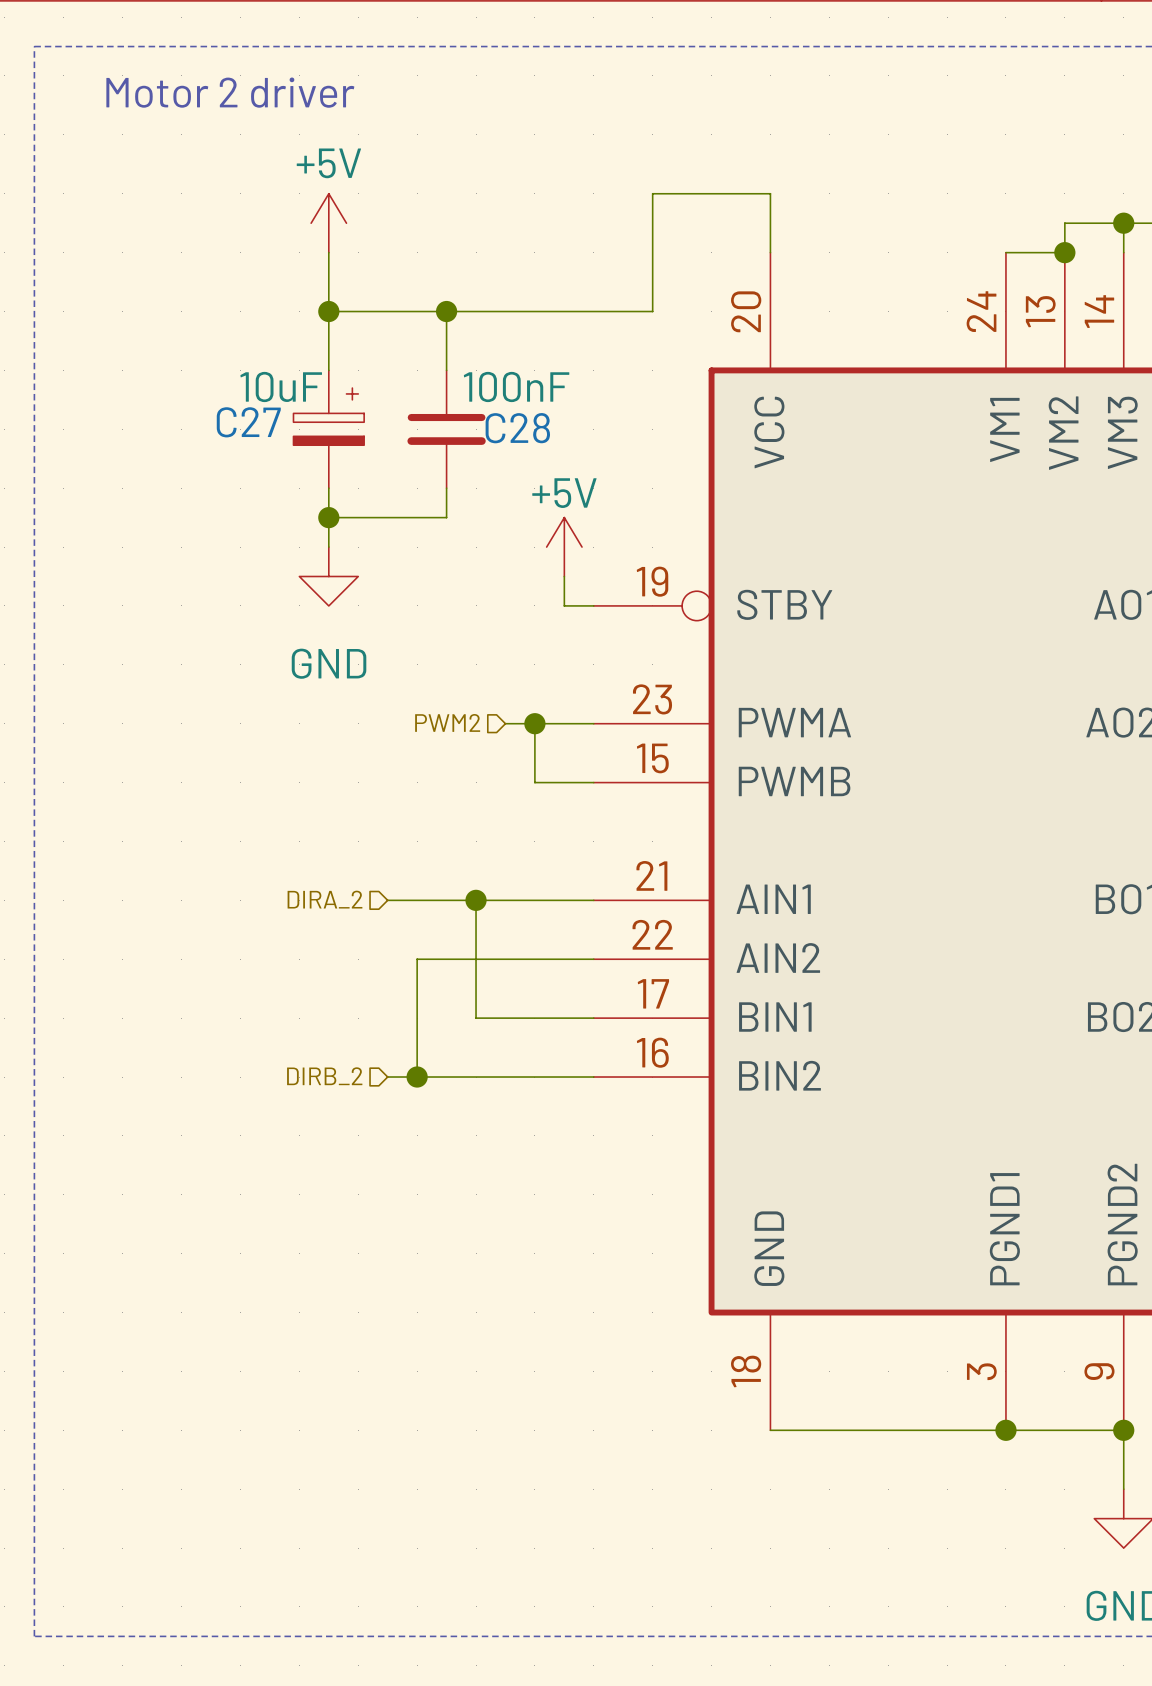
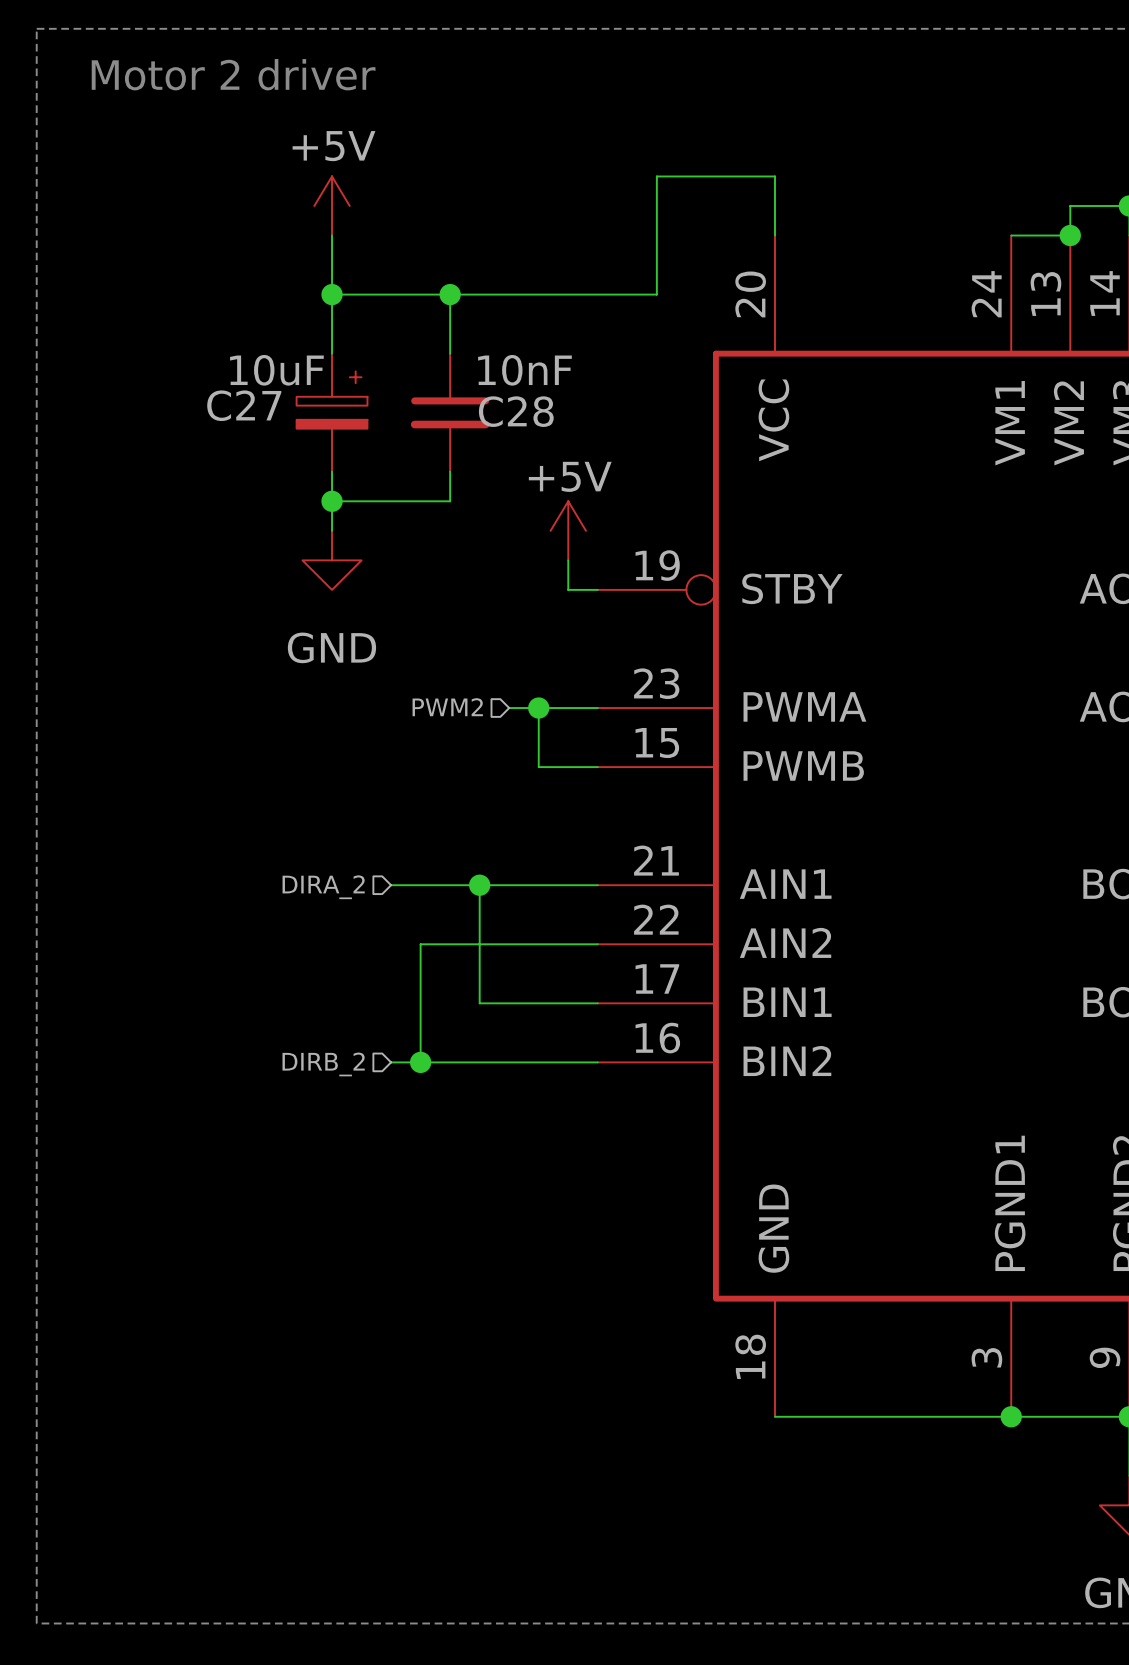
C28 value: 100nF (516, 386) -> 10nF (524, 370)

